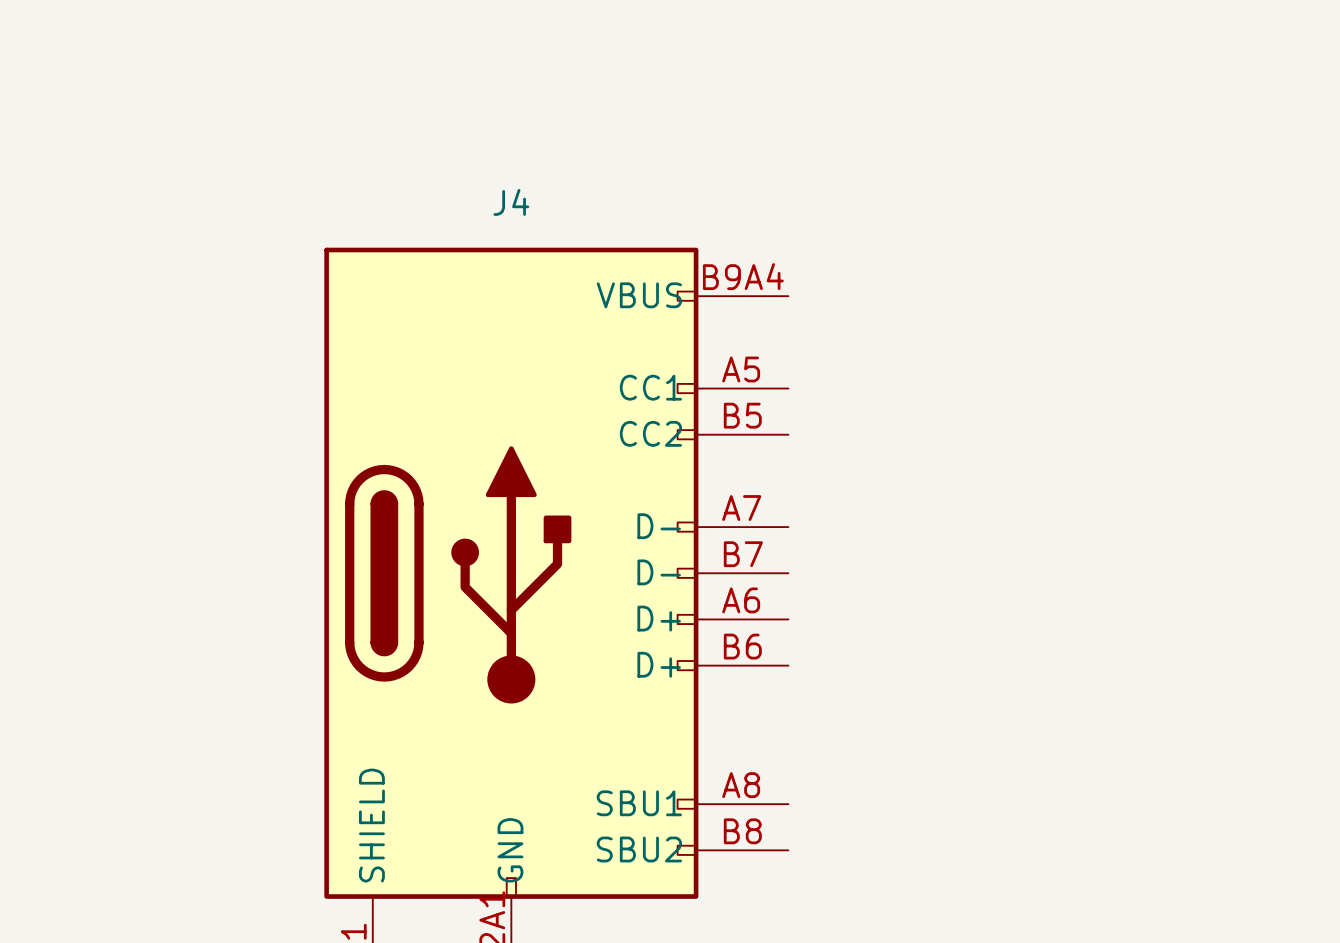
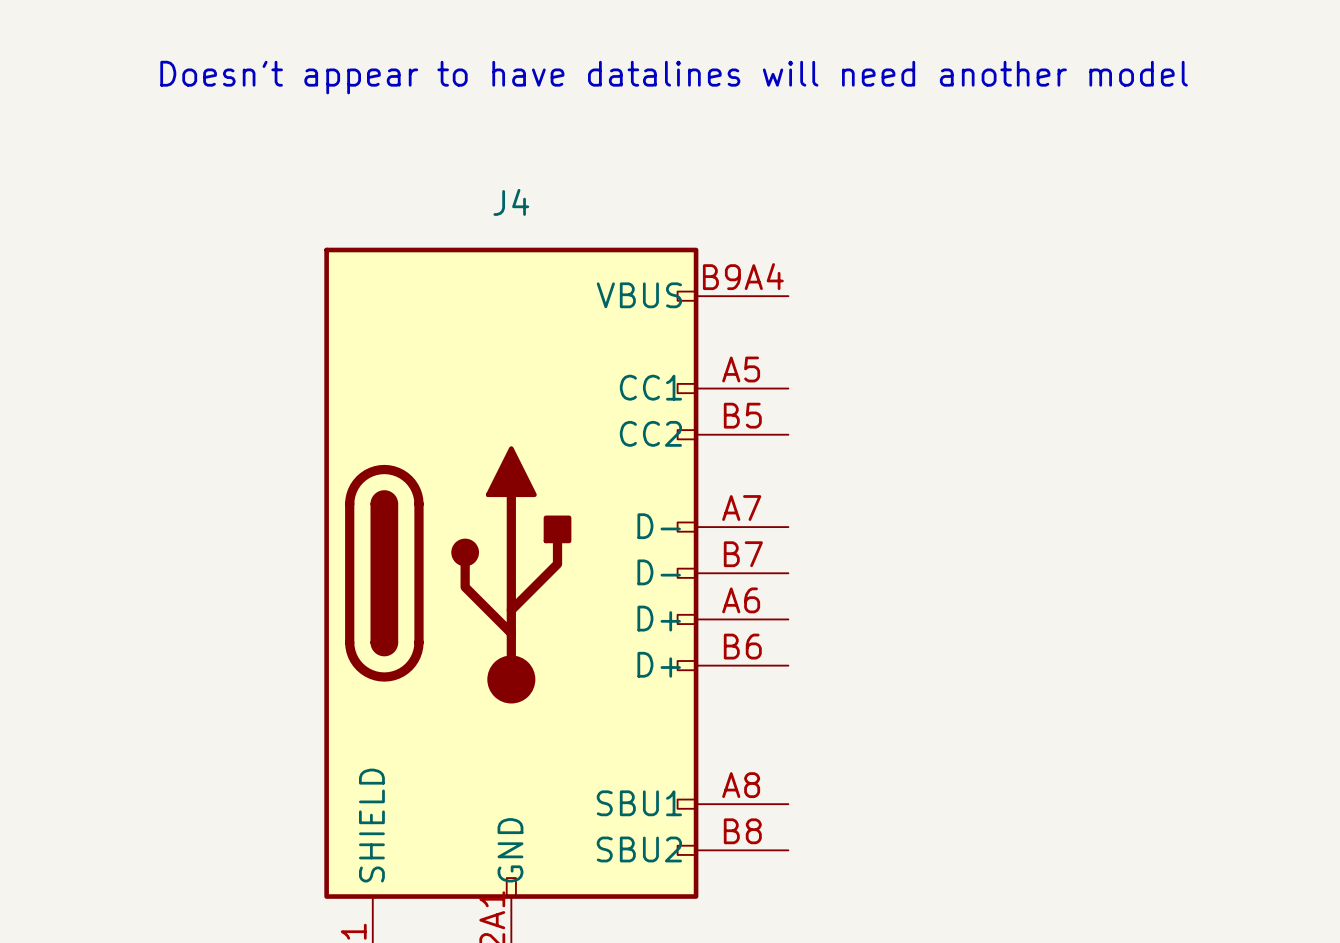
text: none -> Doesn't appear to have datalines will need another model (674, 77)

